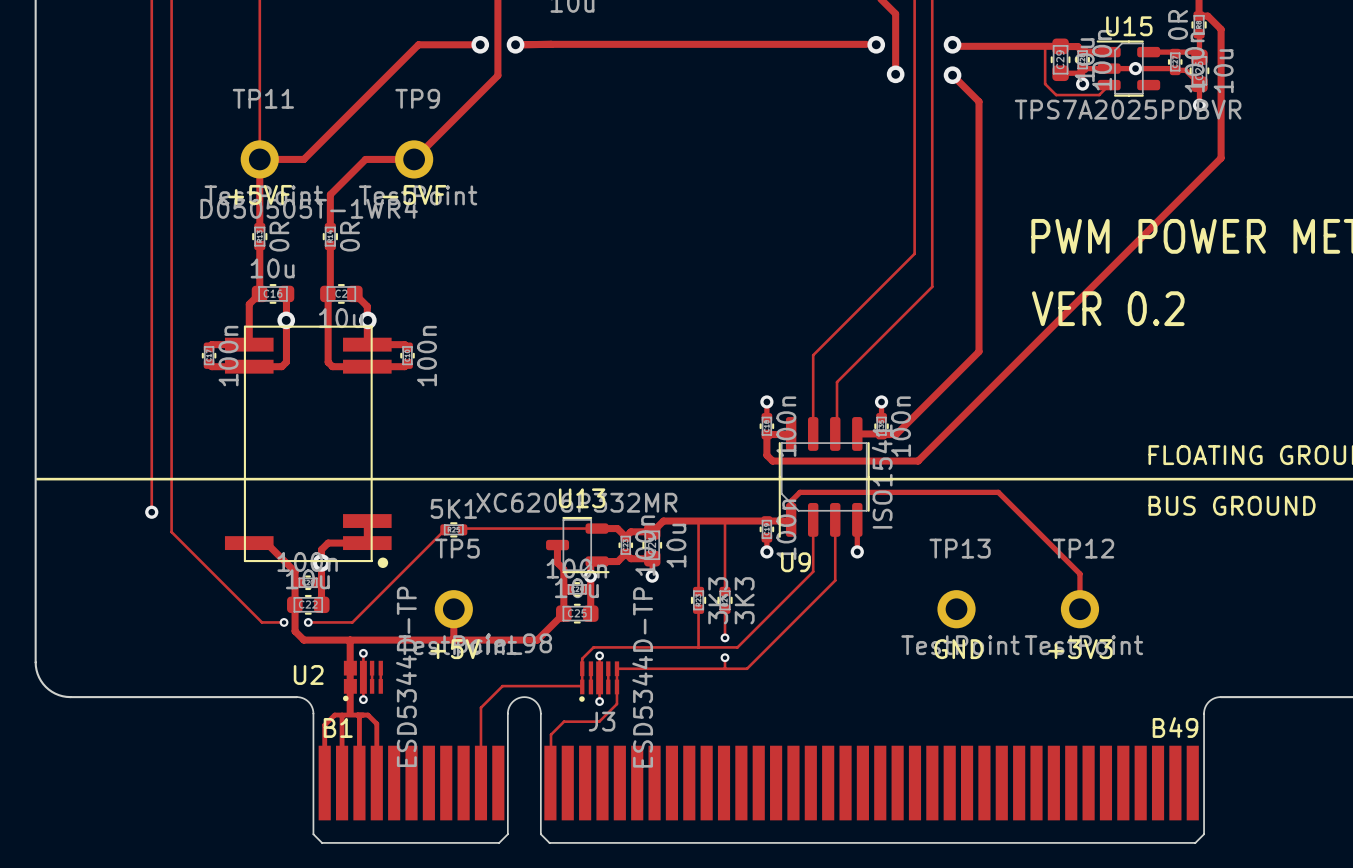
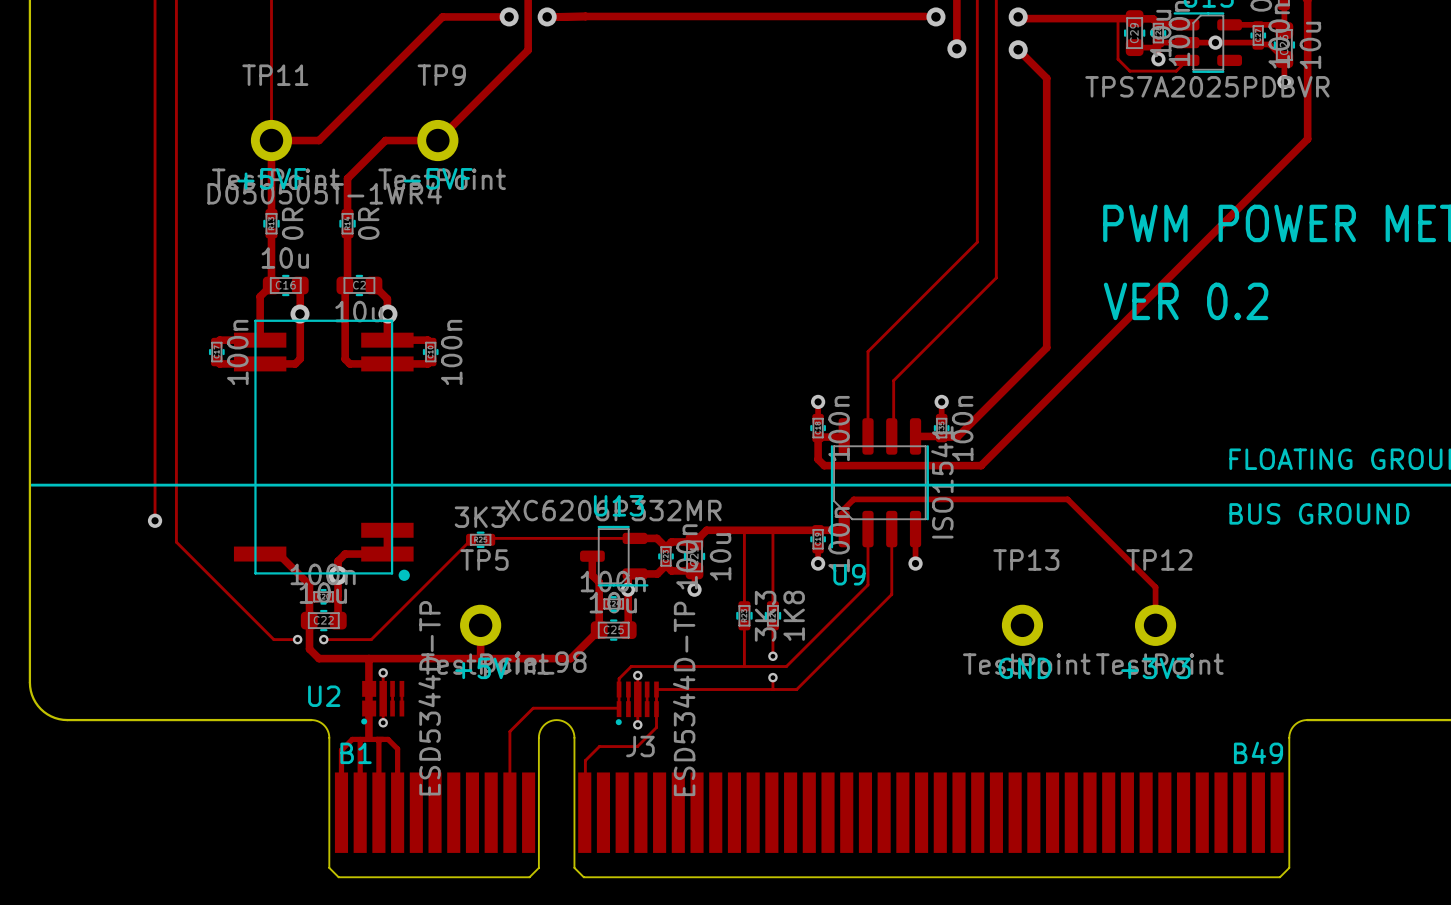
part value: 5K1 (453, 508) -> 3K3 (480, 517)
part value: 3K3 (744, 600) -> 1K8 (794, 615)

